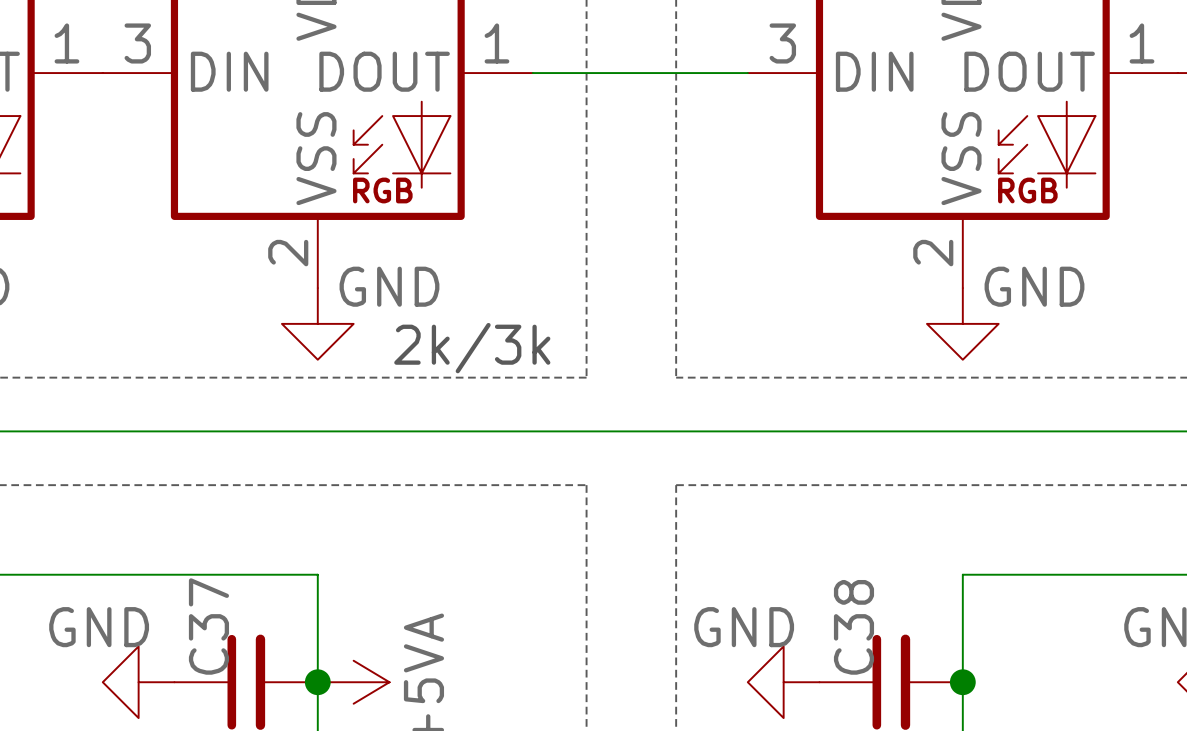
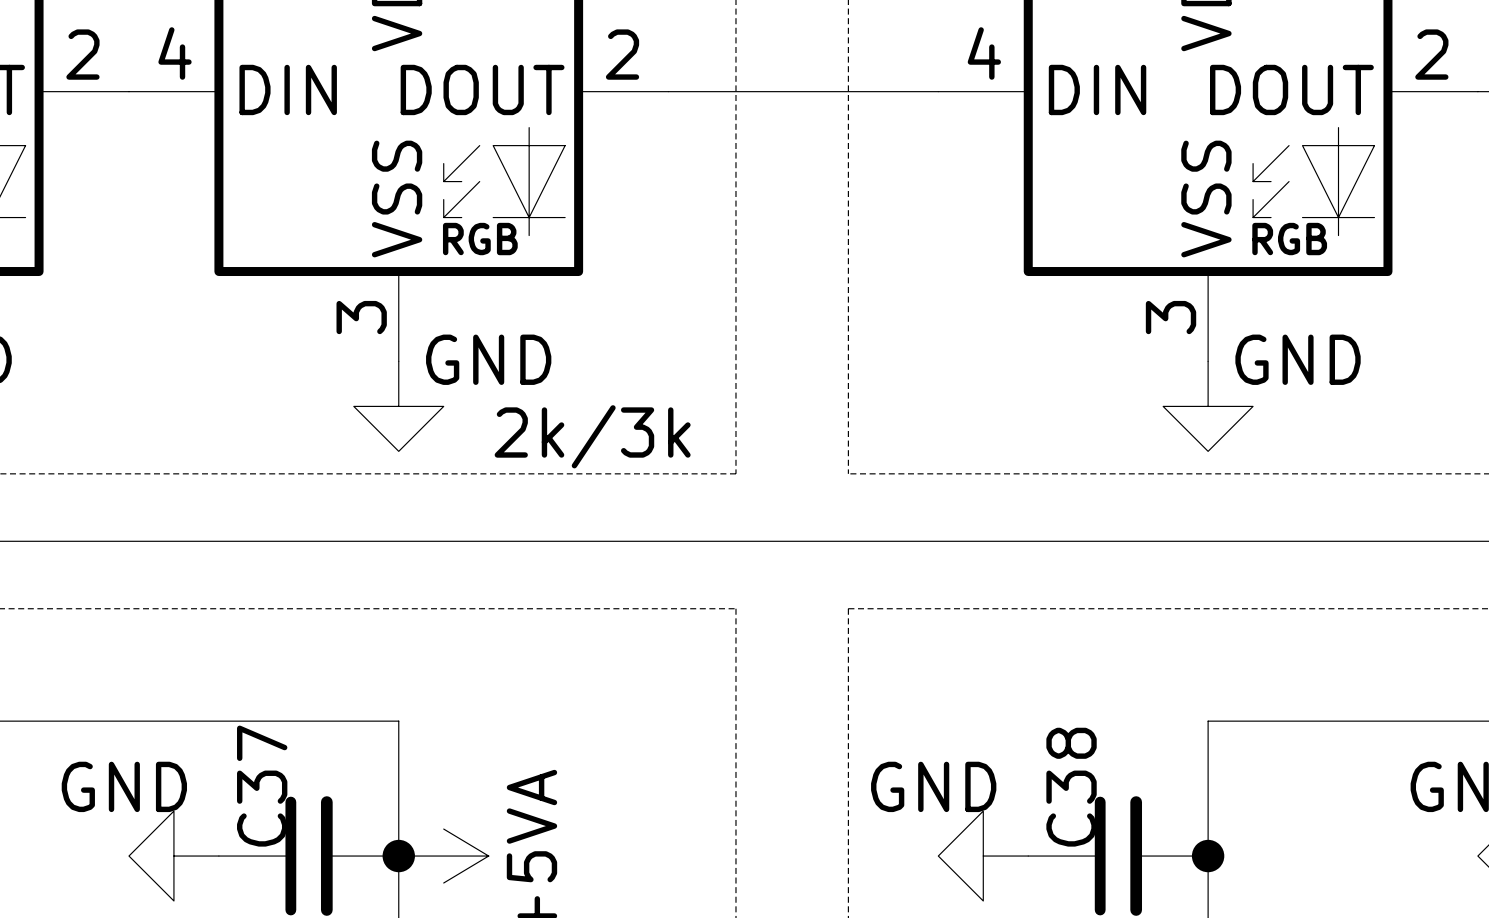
part pin number: 1 (66, 43) -> 2 (82, 54)
part pin number: 3 (137, 43) -> 4 (175, 53)
part pin number: 1 (496, 43) -> 2 (622, 54)
part pin number: 3 (782, 43) -> 4 (984, 53)
part pin number: 1 (1142, 43) -> 2 (1431, 54)
part pin number: 2 (288, 253) -> 3 (361, 317)
part pin number: 2 (933, 253) -> 3 (1171, 317)

